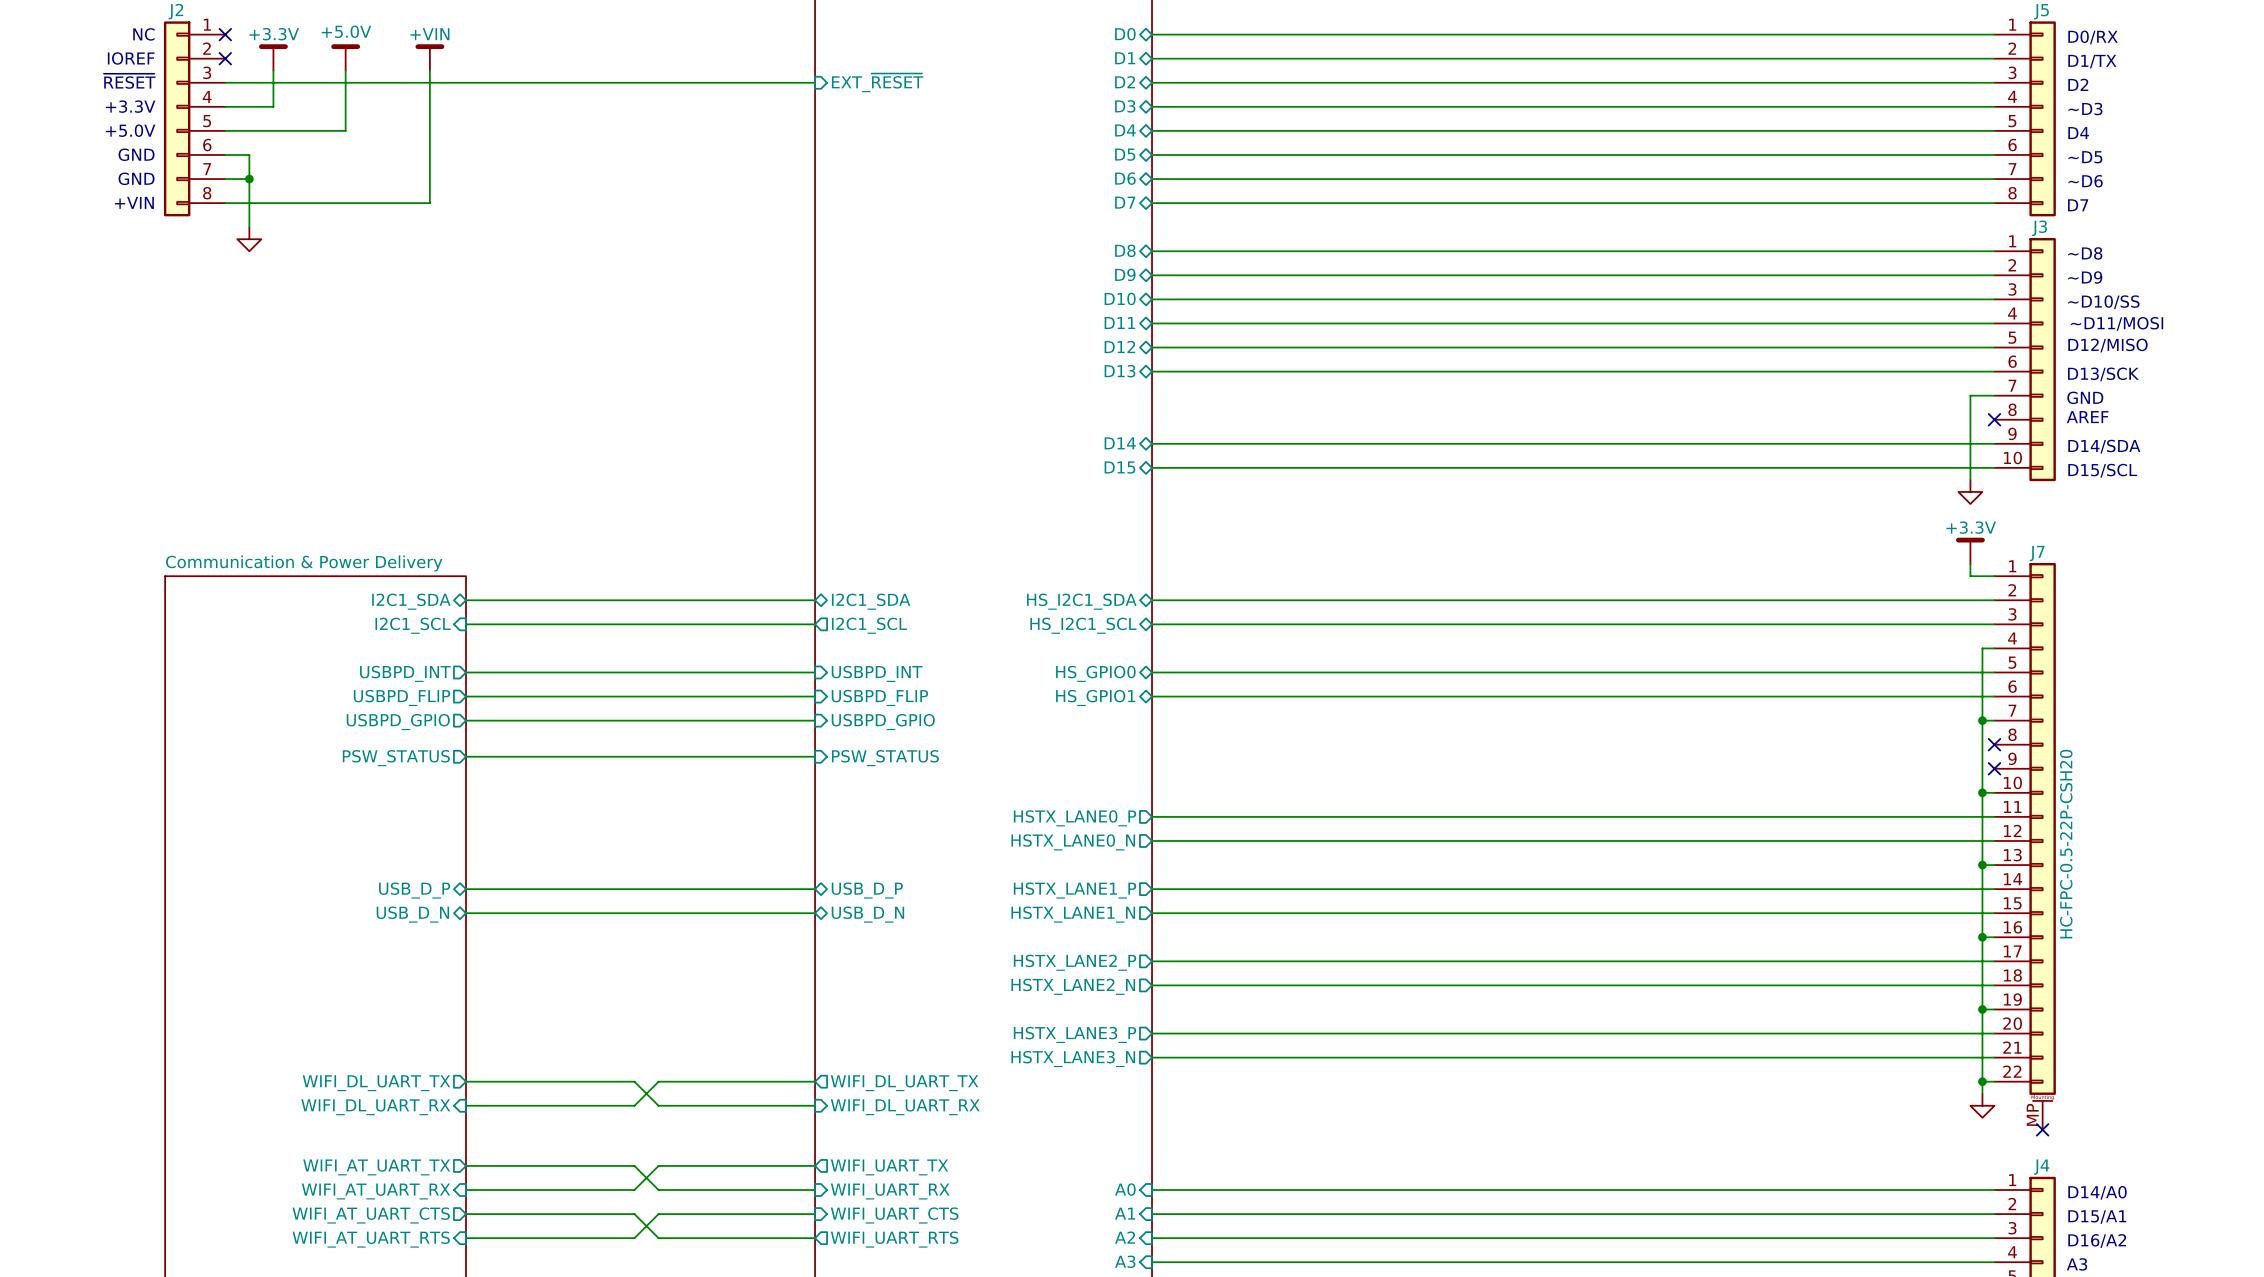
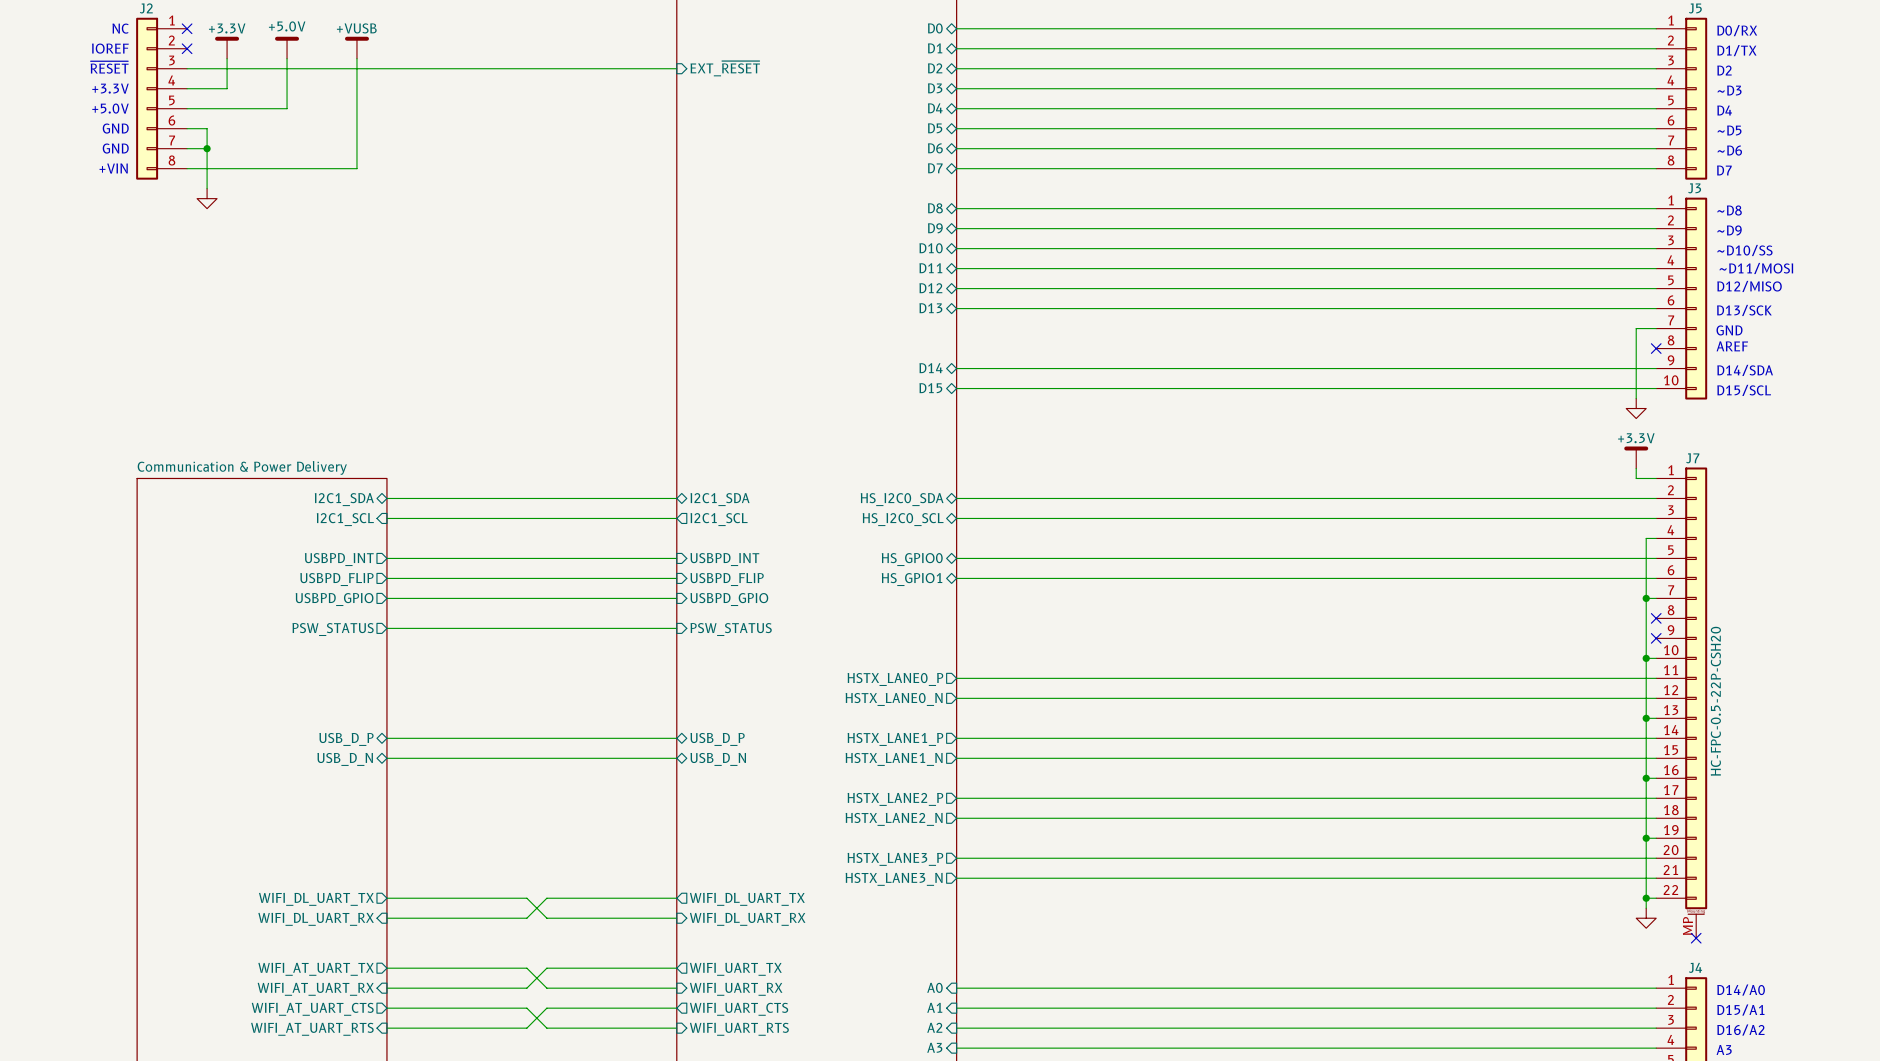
power symbol: +VIN (429, 57) -> +VUSB (356, 47)
sheet pin: HS_I2C1_SDA (1081, 601) -> HS_I2C0_SDA (902, 499)
sheet pin: HS_I2C1_SCL (1083, 625) -> HS_I2C0_SCL (903, 519)
sheet pin shape: input (894, 1215) -> output (739, 1009)
sheet pin shape: output (894, 1239) -> input (739, 1029)

